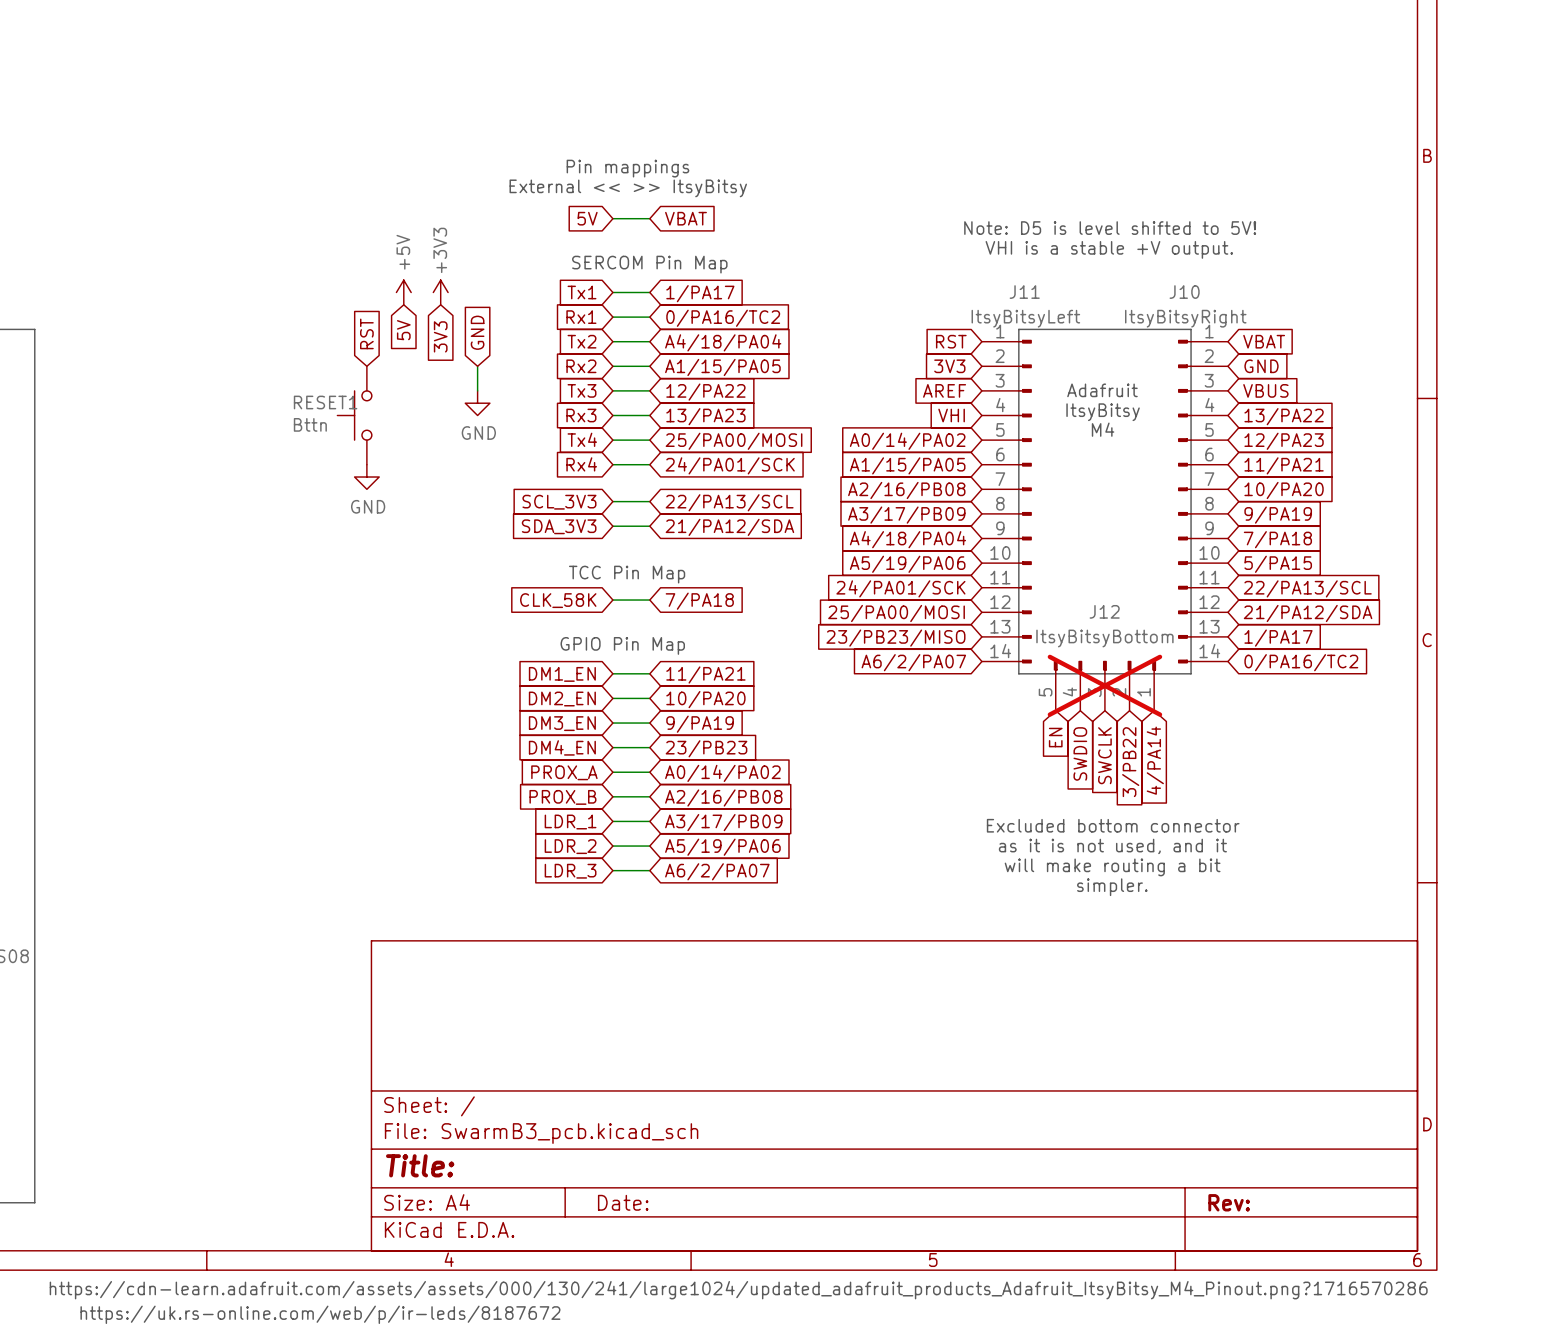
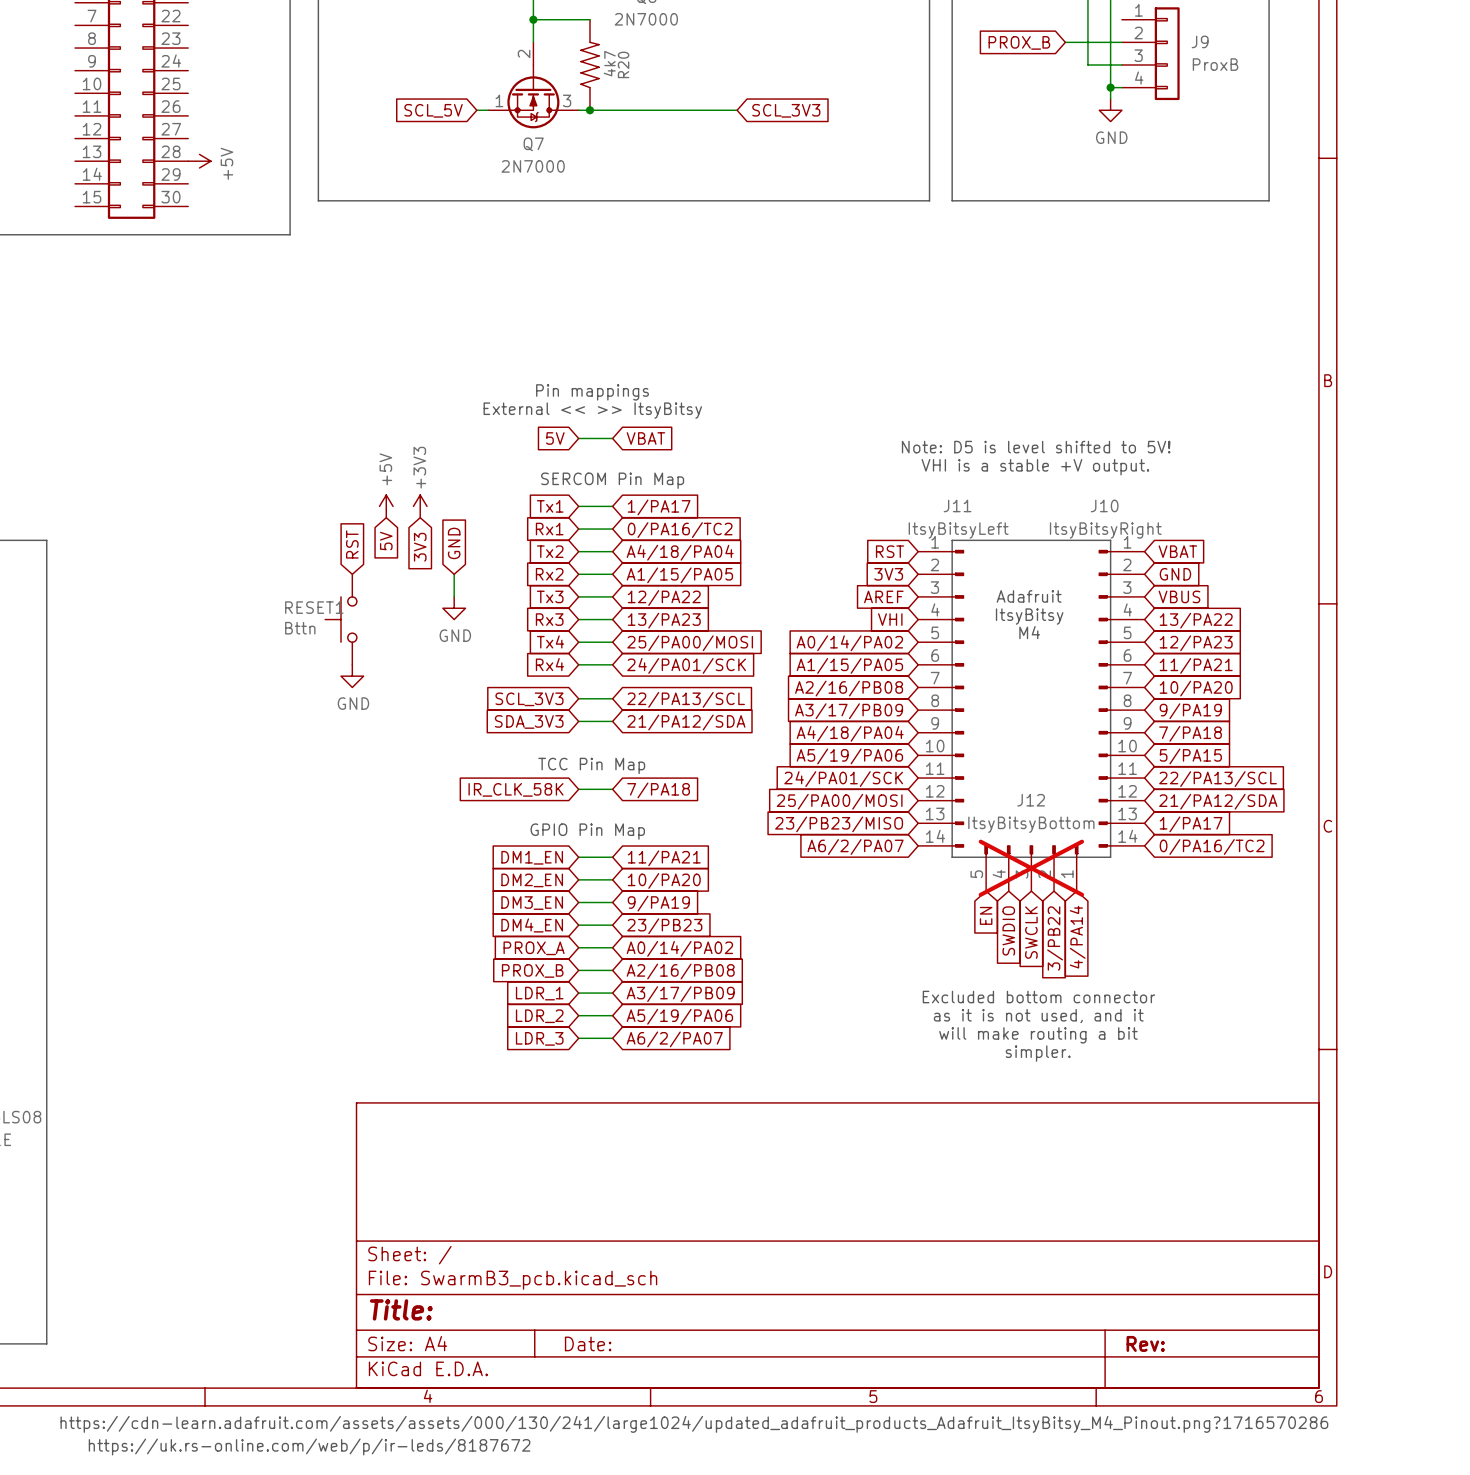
global label: CLK_58K (558, 600) -> IR_CLK_58K (516, 789)

